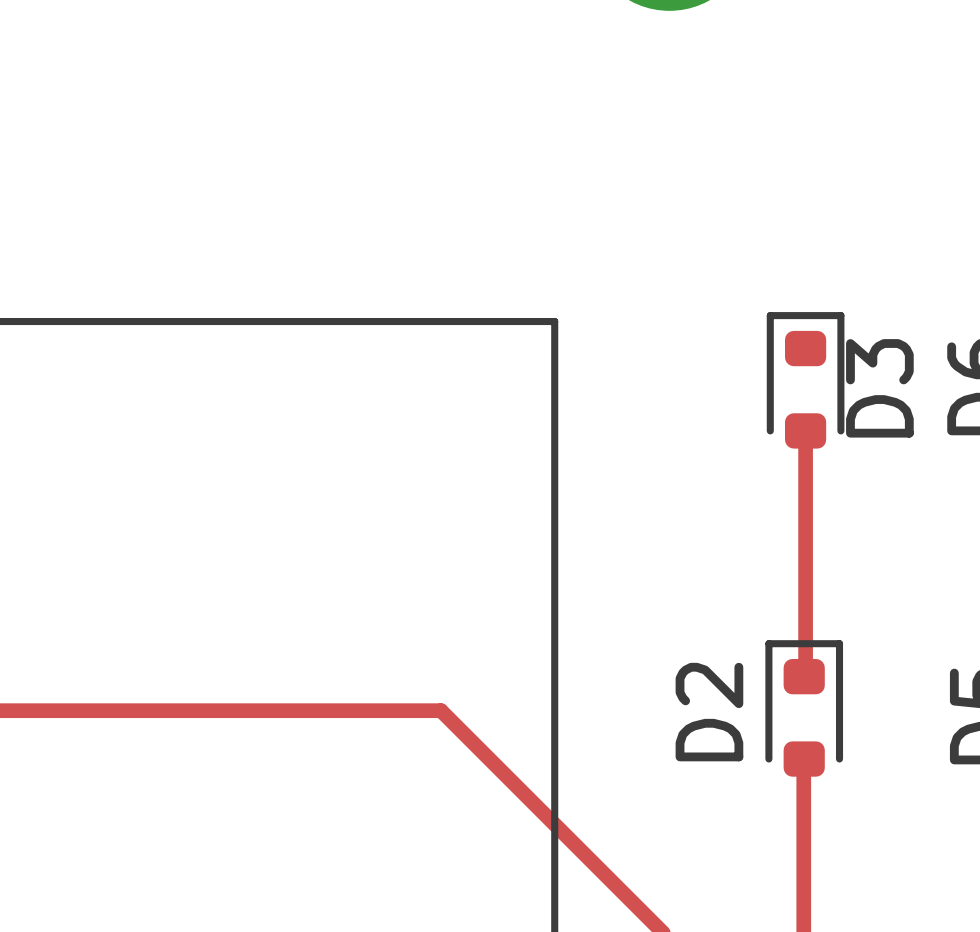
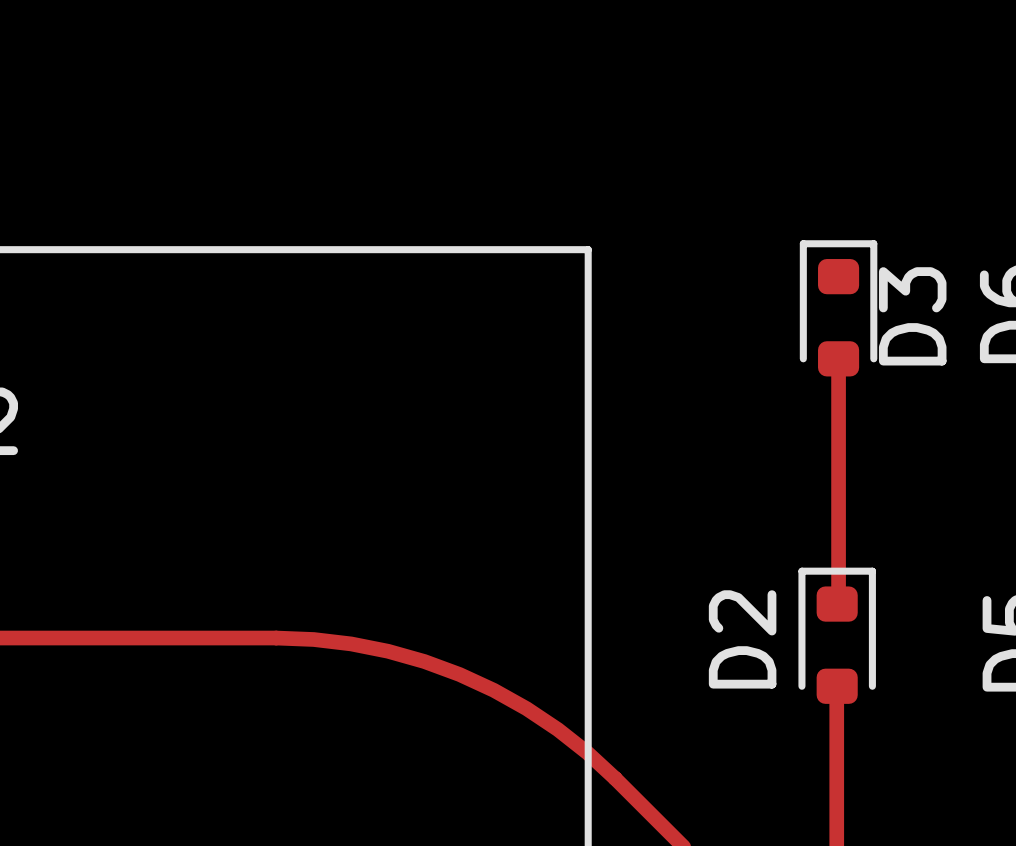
top track: (242, 710) (441, 710) (581, 851) -> (276, 638) (351, 643) (388, 651) (459, 674) (493, 690) (557, 729) (615, 778)

